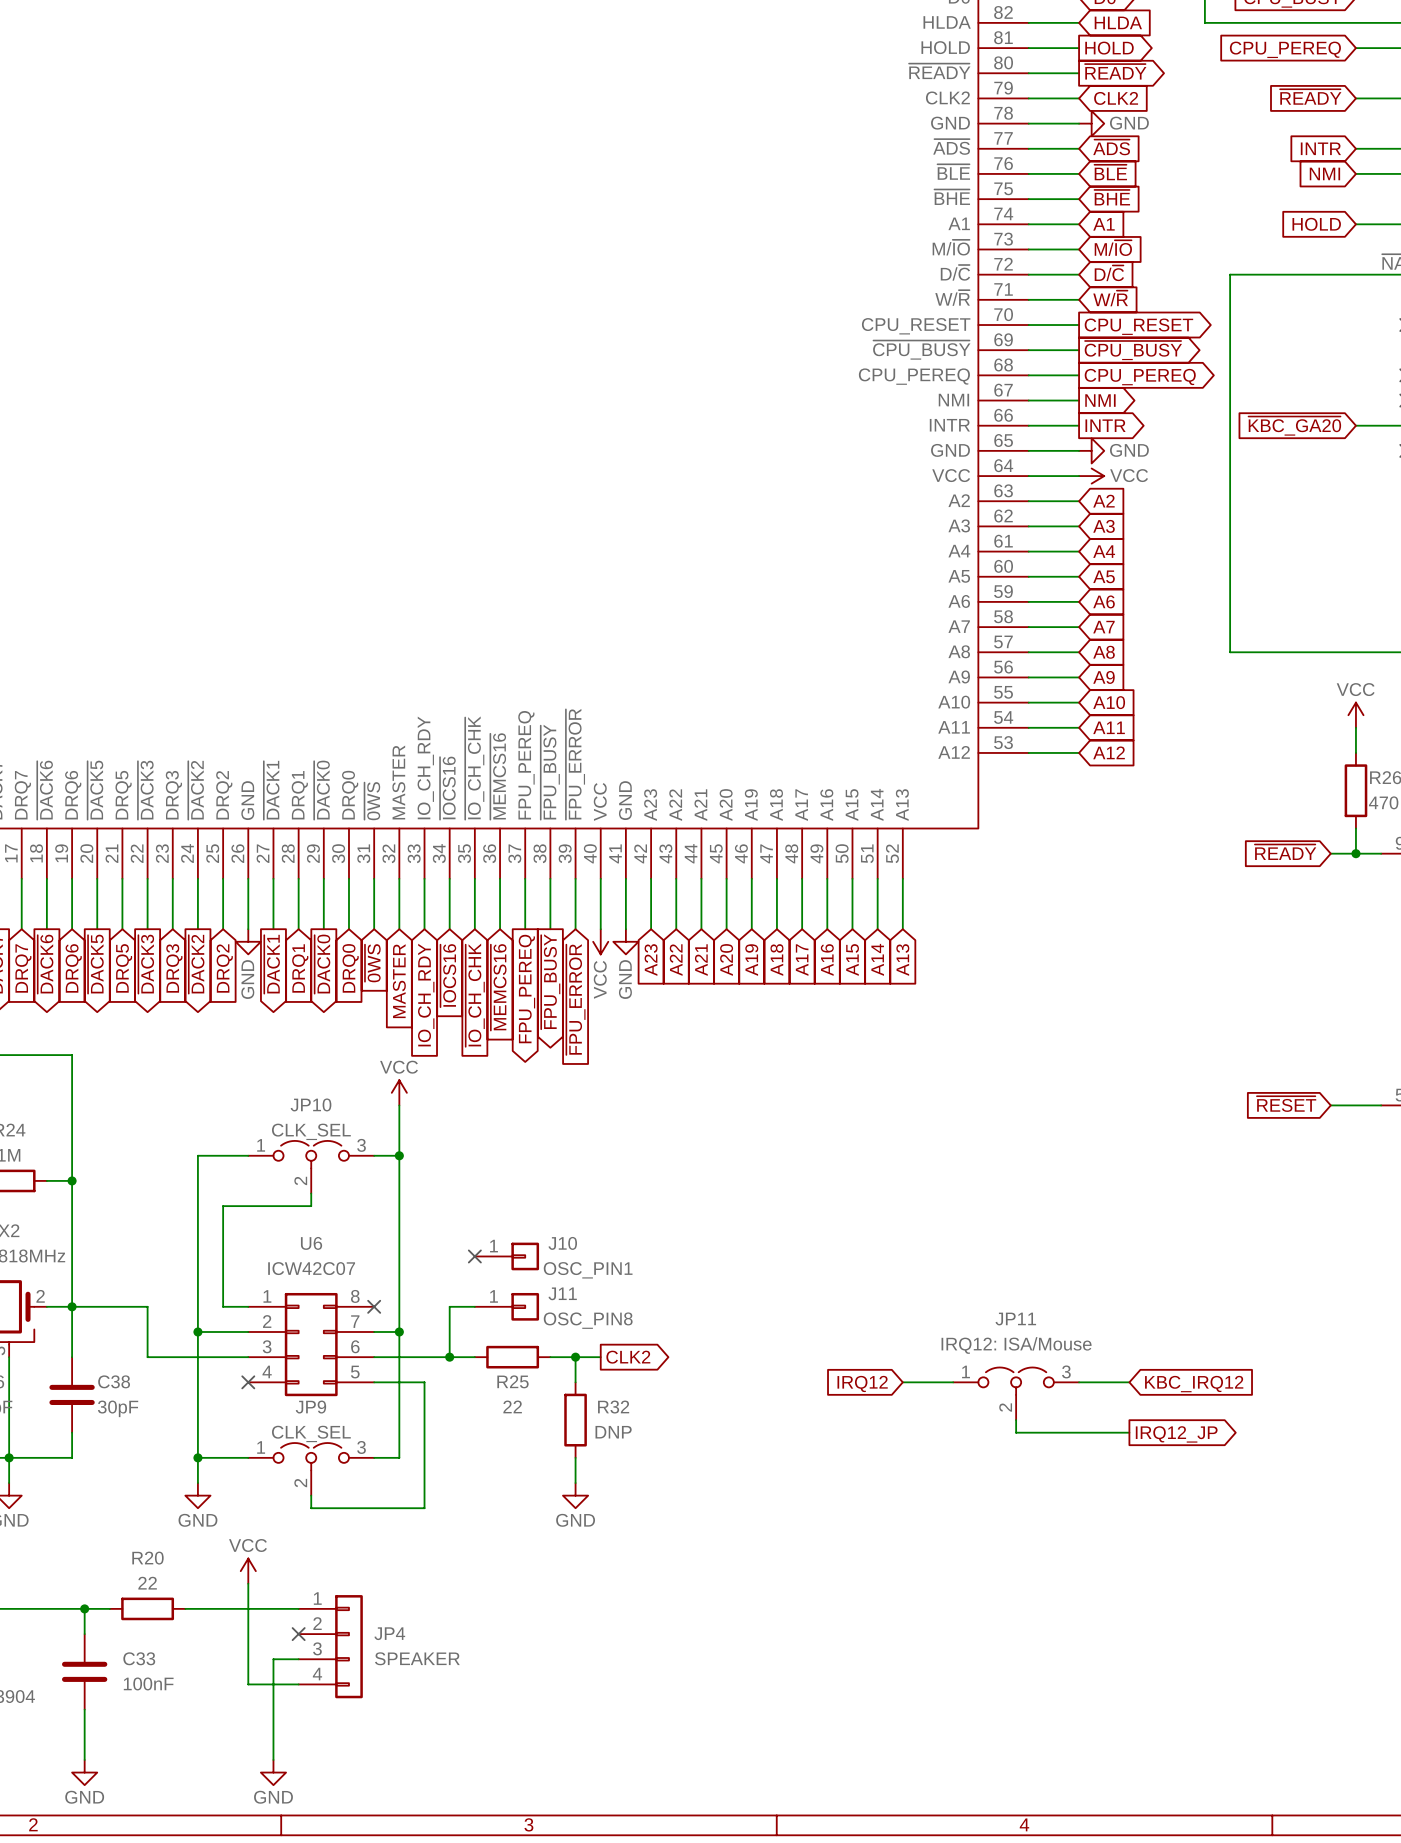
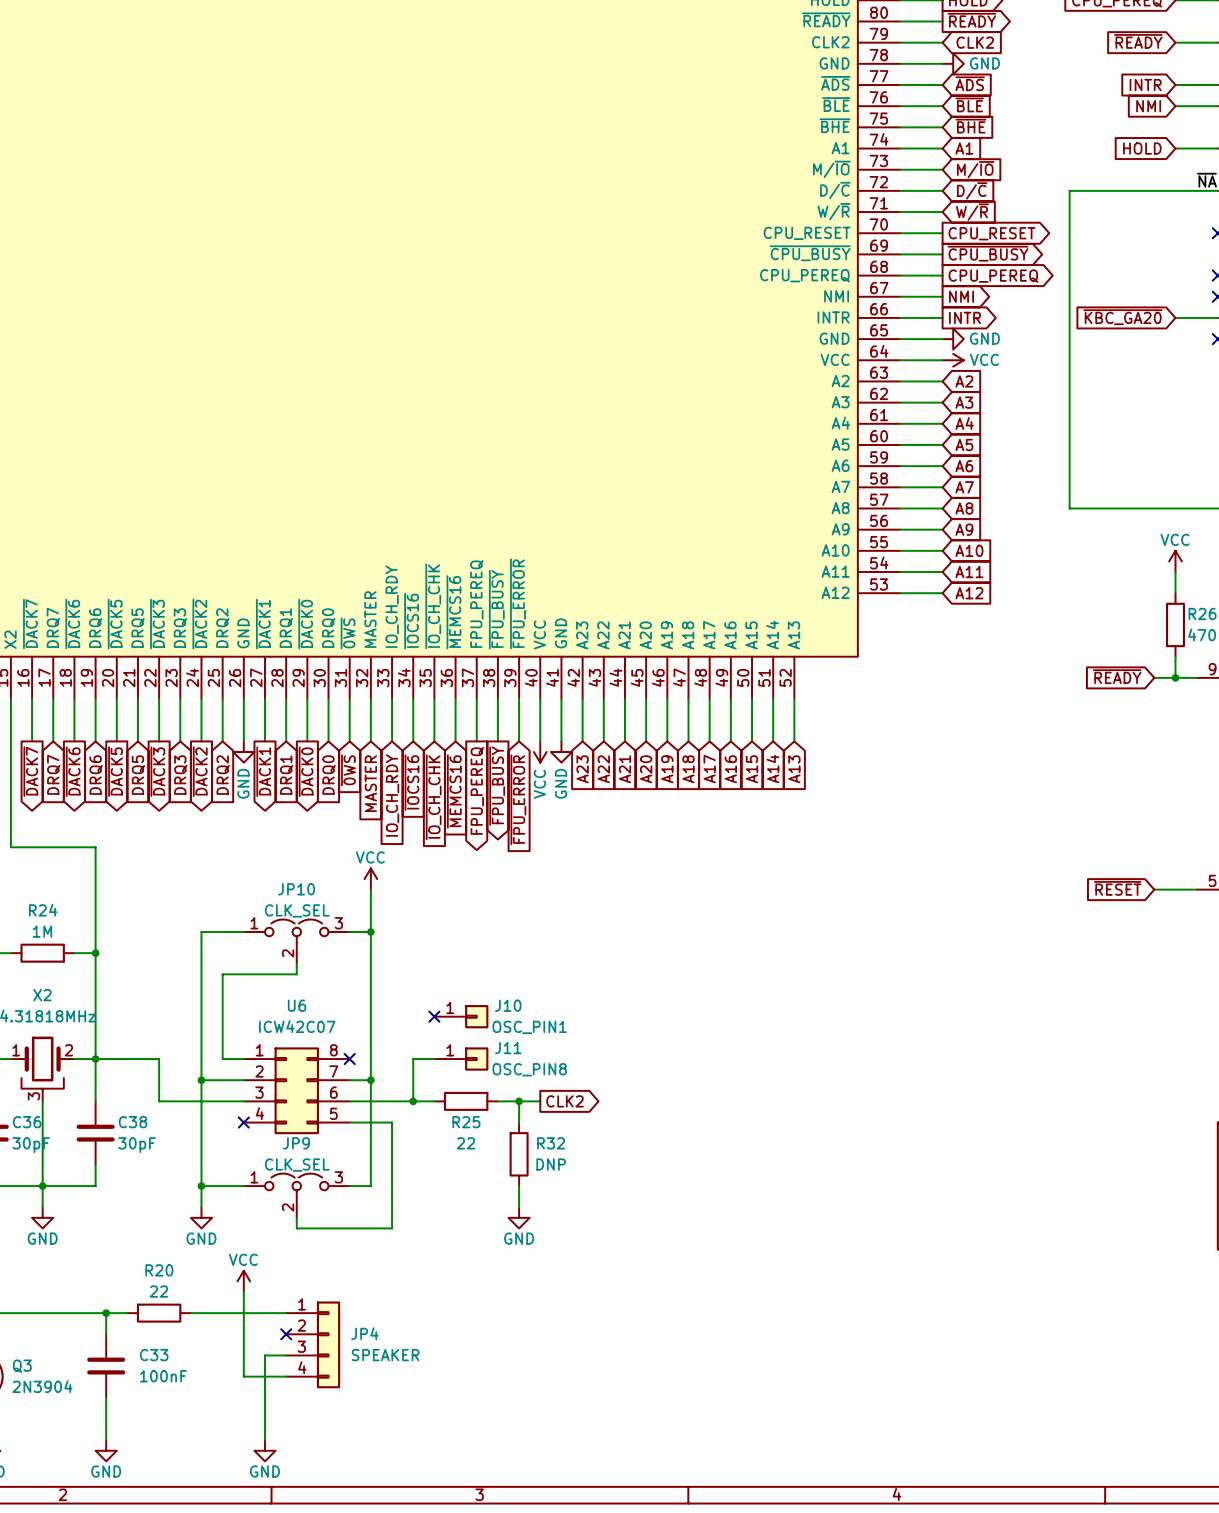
wire: (902, 1382) (953, 1382) -> none
wire: (1079, 1382) (1129, 1382) -> none
global label: IRQ12 (862, 1383) -> none
global label: KBC_IRQ12 (1194, 1384) -> none
JP11: IRQ12: ISA/Mouse (1016, 1393) -> none
wire: (1016, 1420) (1016, 1432) (1129, 1432) -> none
global label: IRQ12_JP (1176, 1434) -> none

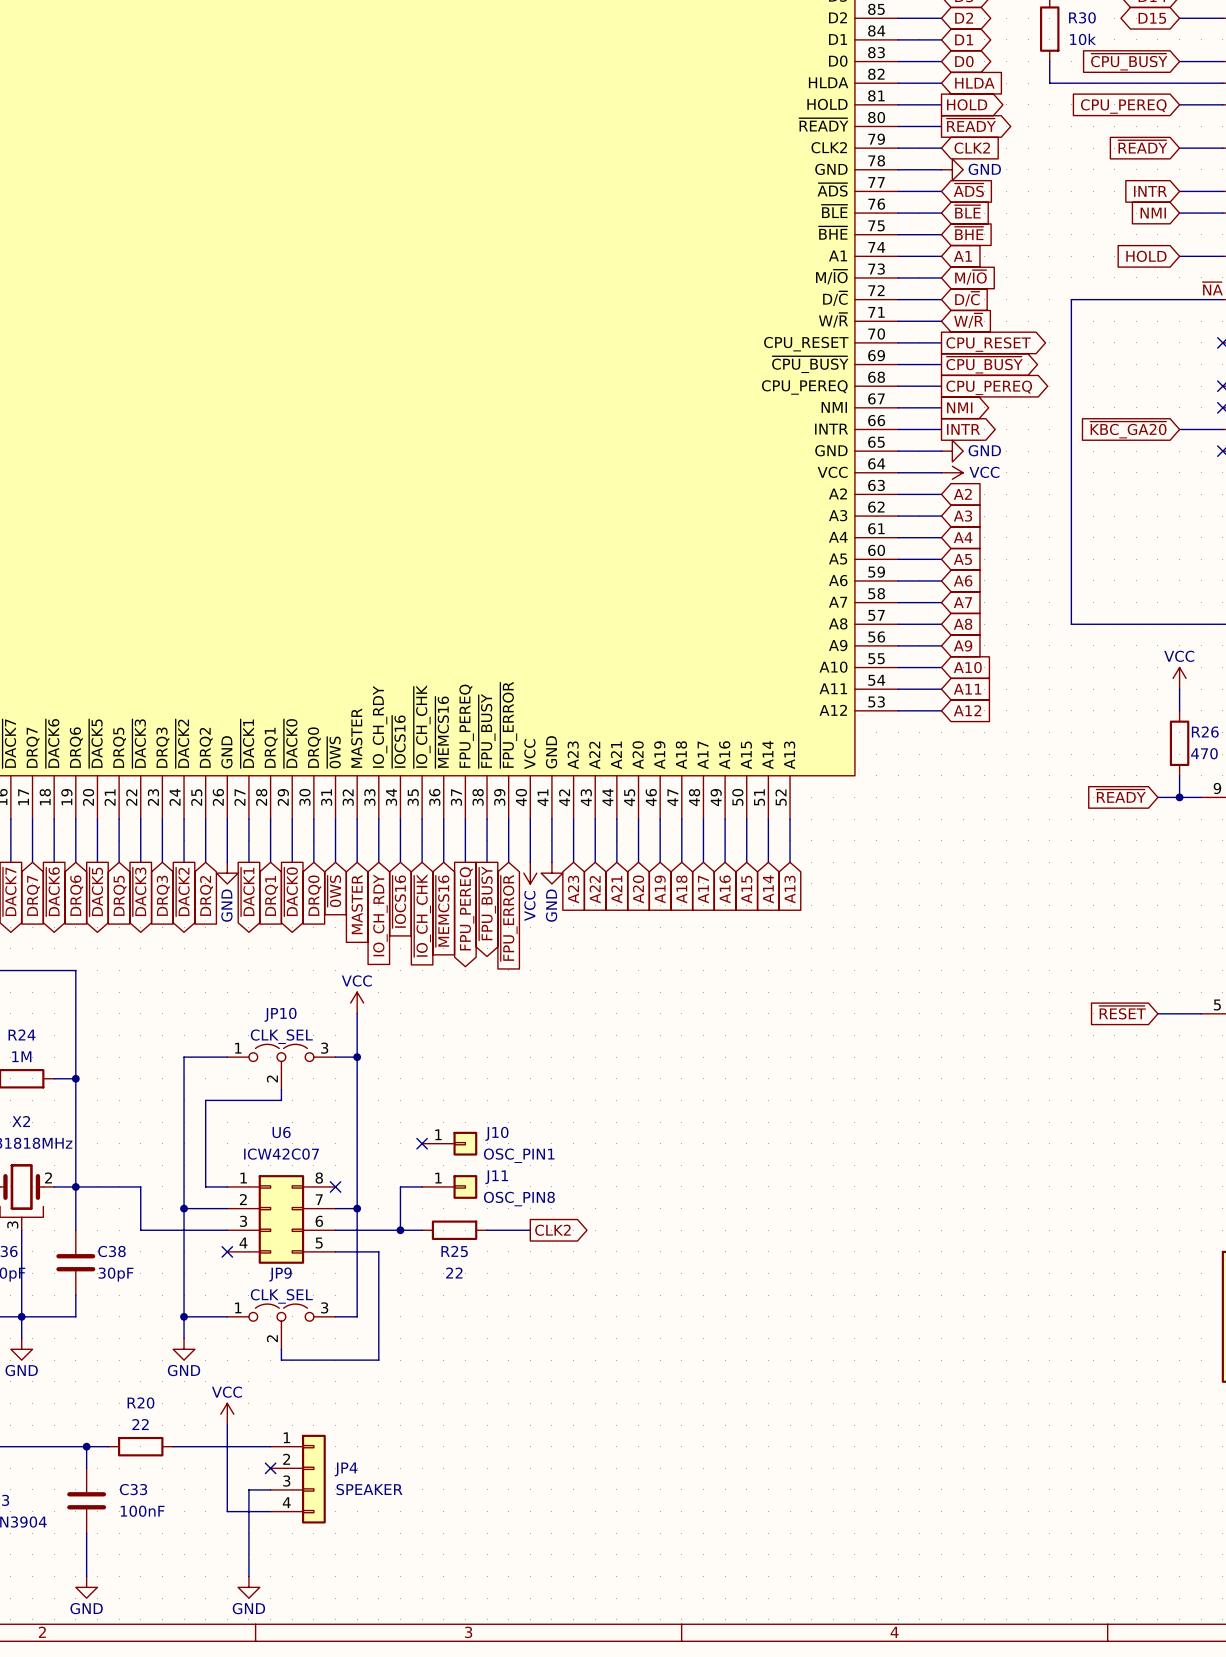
wire: (519, 1101) (519, 1122) -> none
junction: (519, 1101) -> none
R32: DNP (519, 1154) -> none
wire: (519, 1186) (519, 1207) -> none
power symbol: GND (519, 1217) -> none

